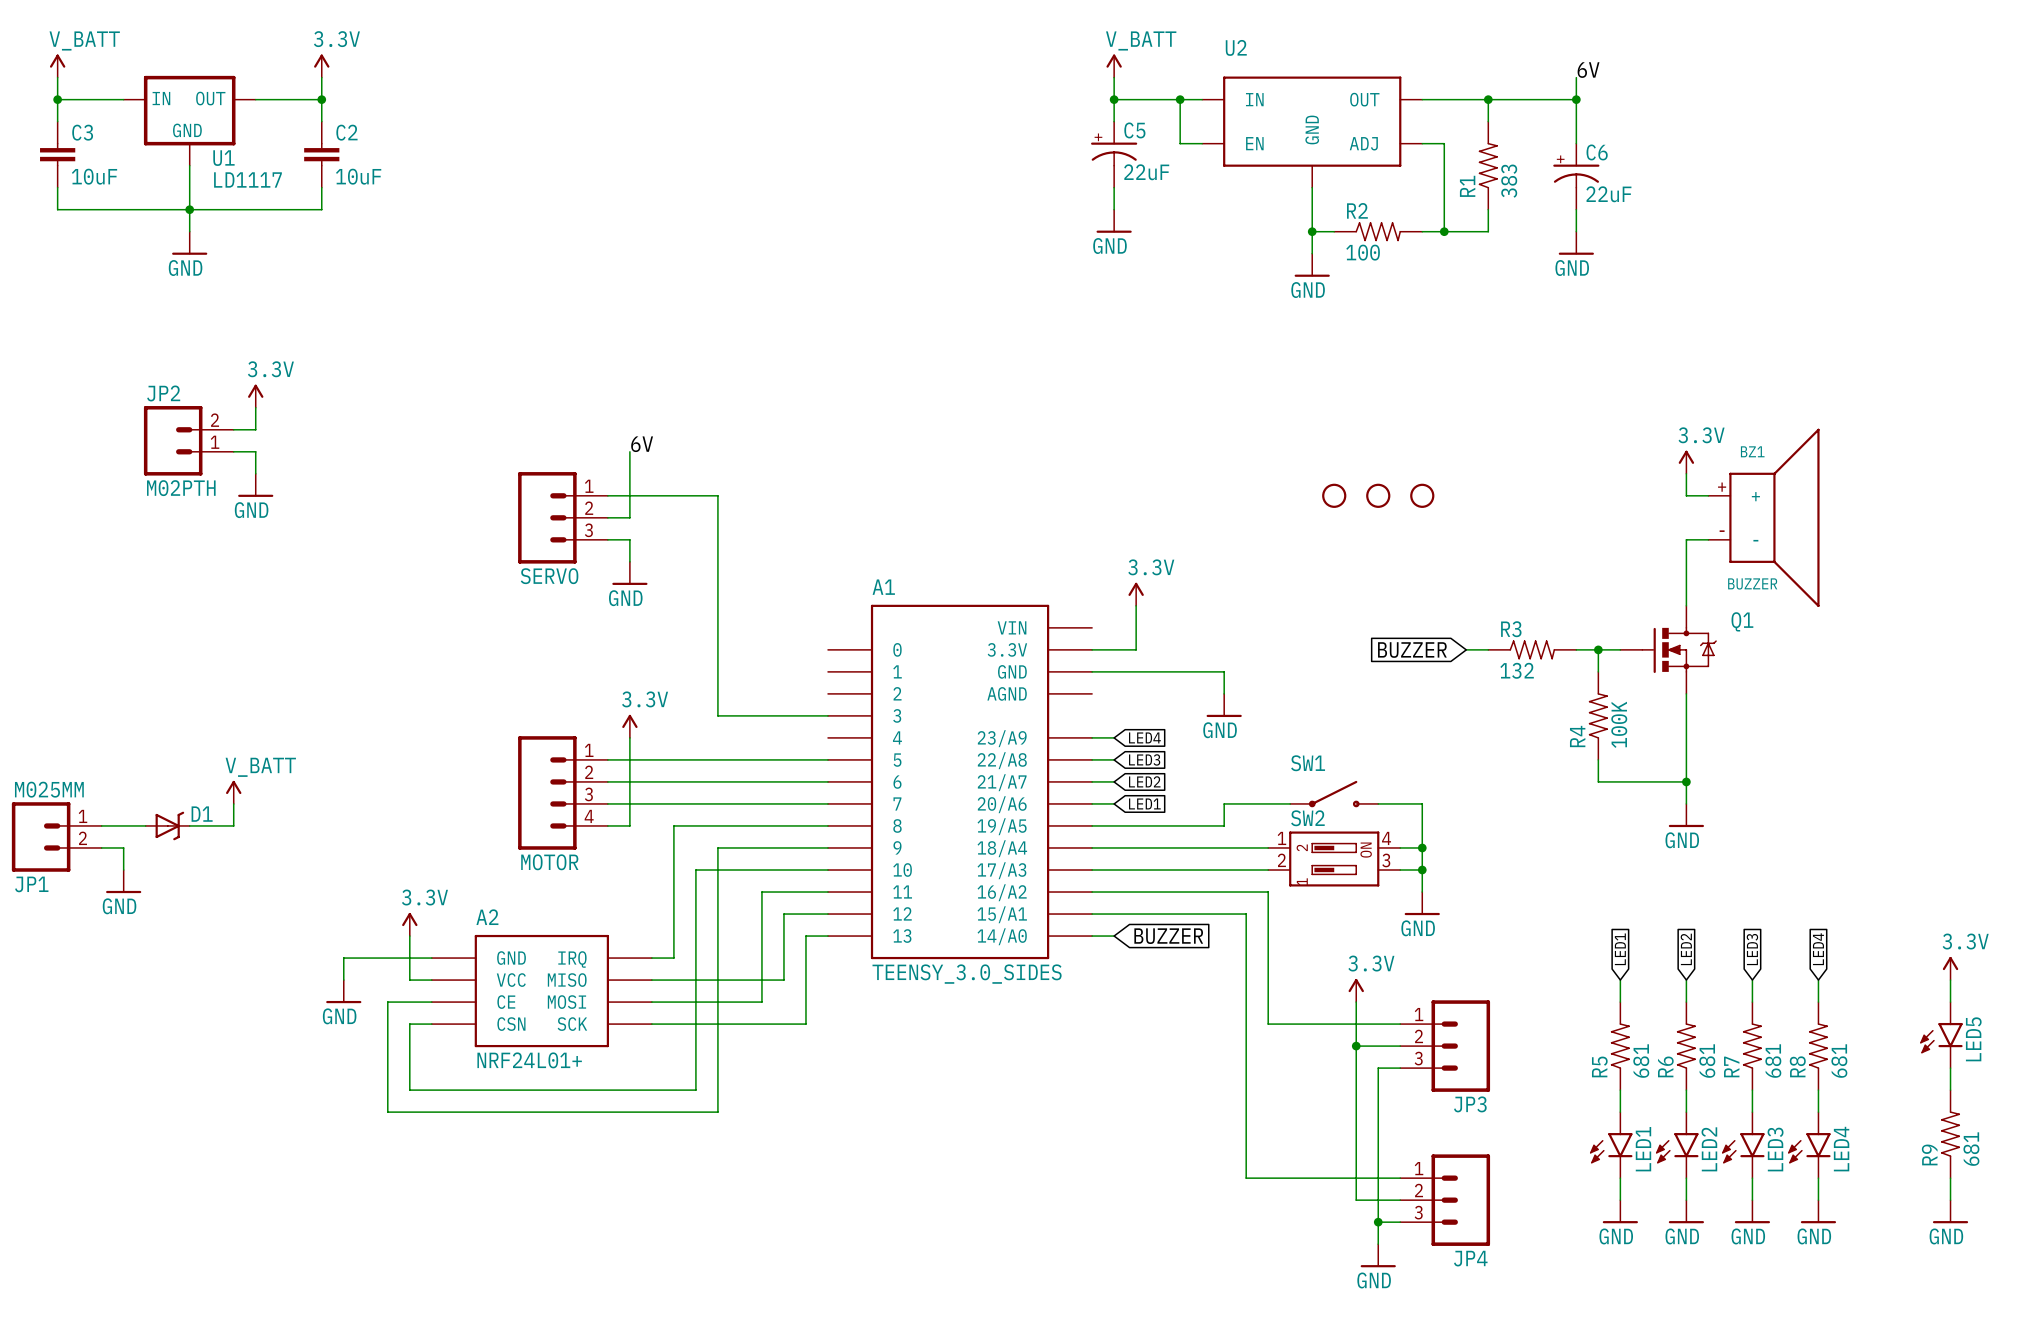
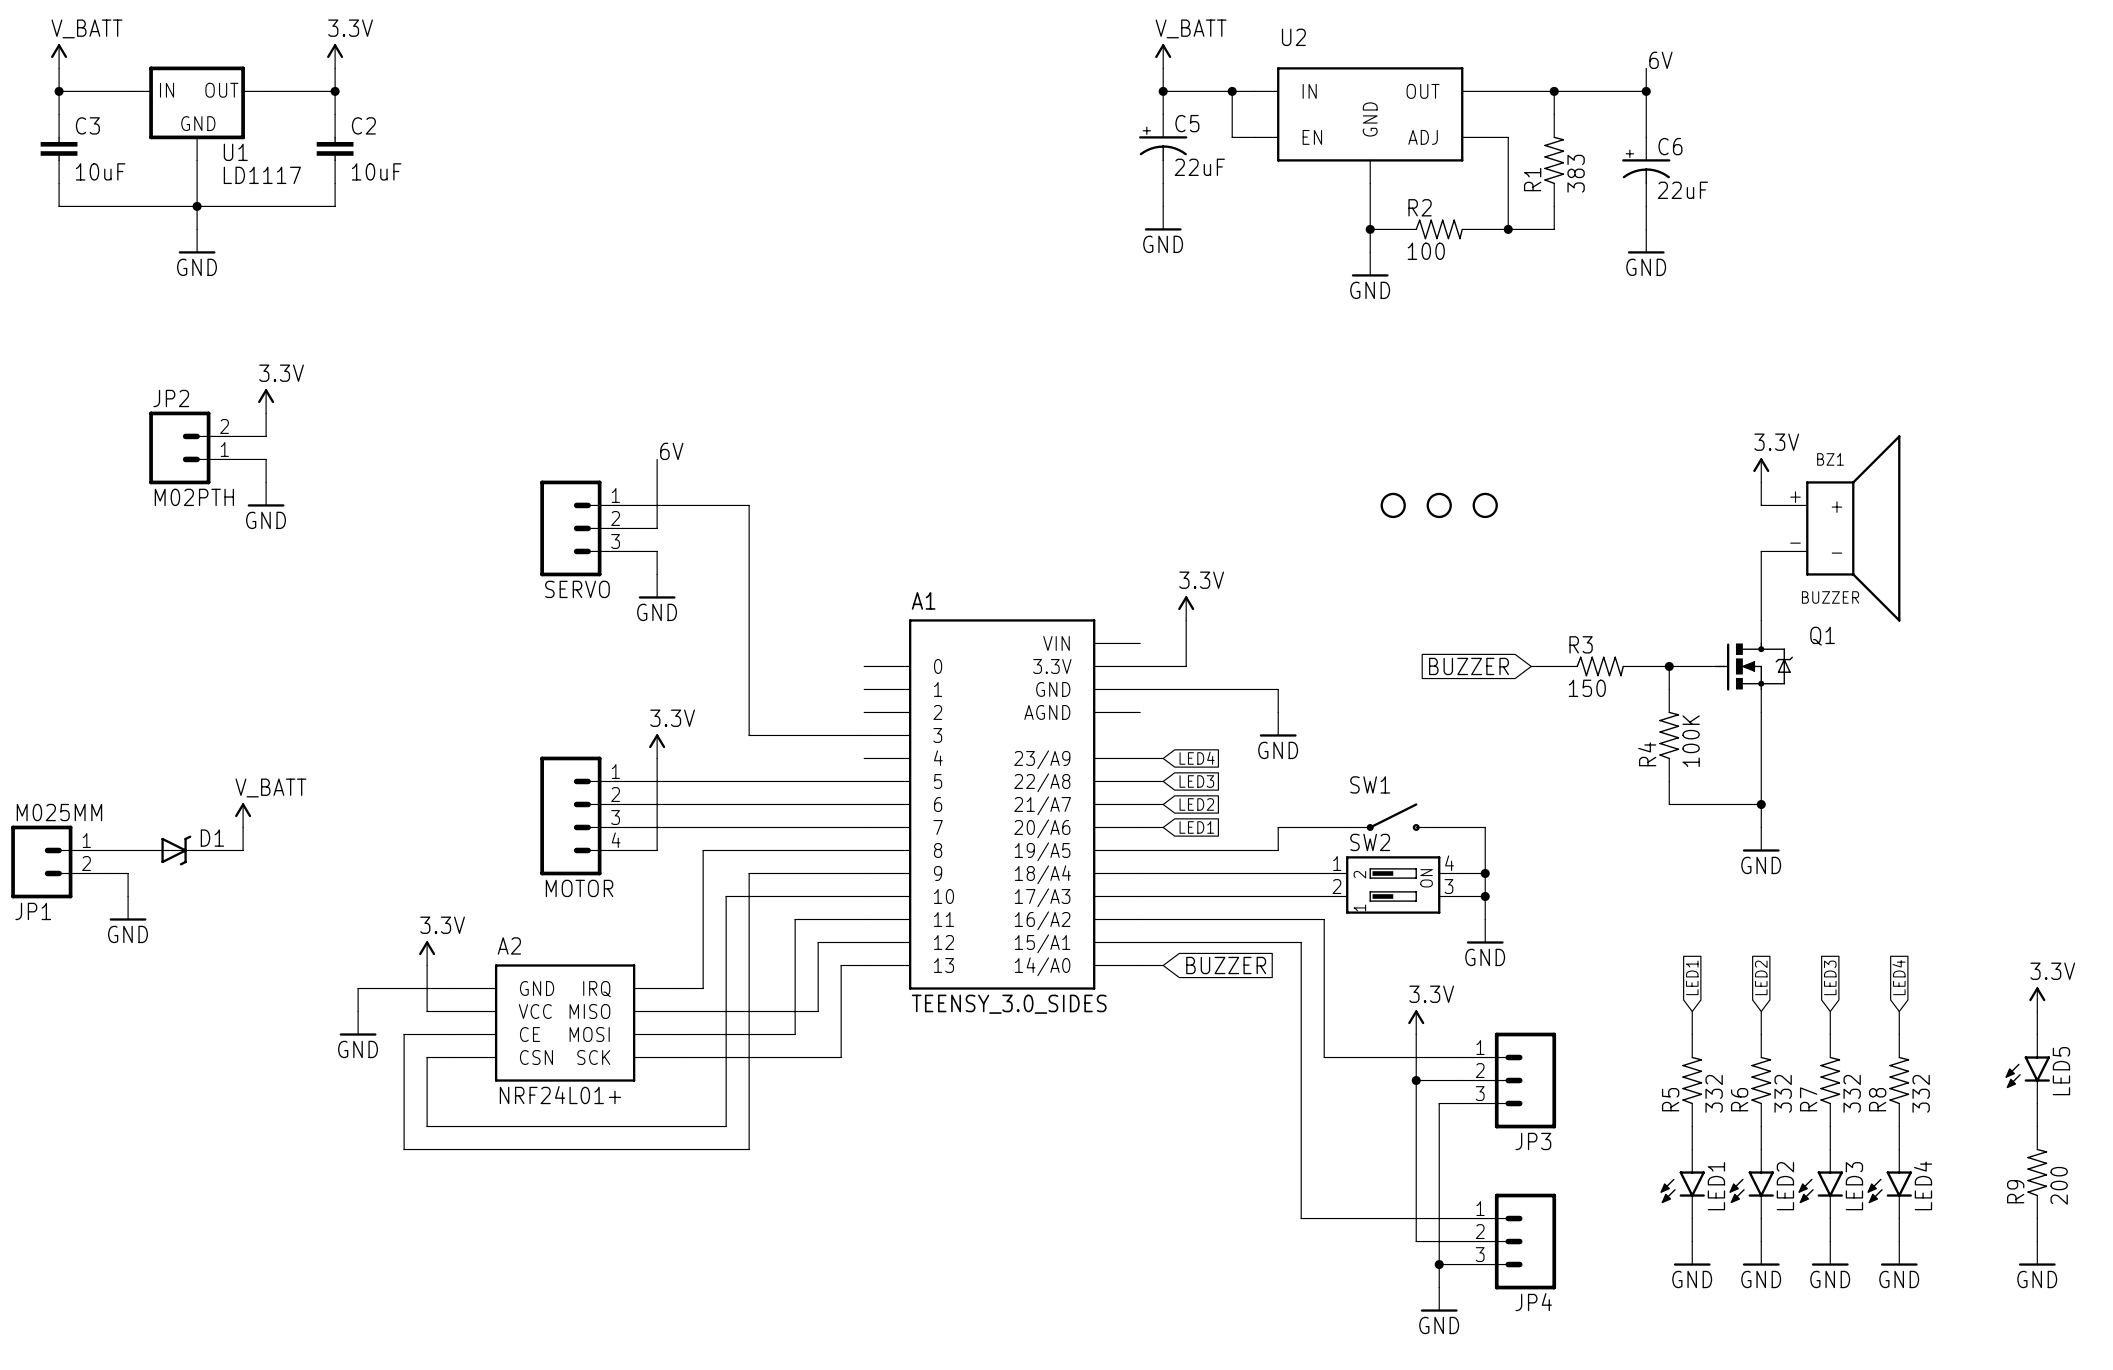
R3 value: 132 (1517, 670) -> 150 (1587, 688)
R5 value: 681 (1641, 1061) -> 332 (1714, 1093)
R6 value: 681 (1707, 1061) -> 332 (1783, 1093)
R7 value: 681 (1773, 1061) -> 332 (1852, 1093)
R8 value: 681 (1839, 1061) -> 332 (1921, 1093)
R9 value: 681 (1971, 1149) -> 200 (2059, 1185)

